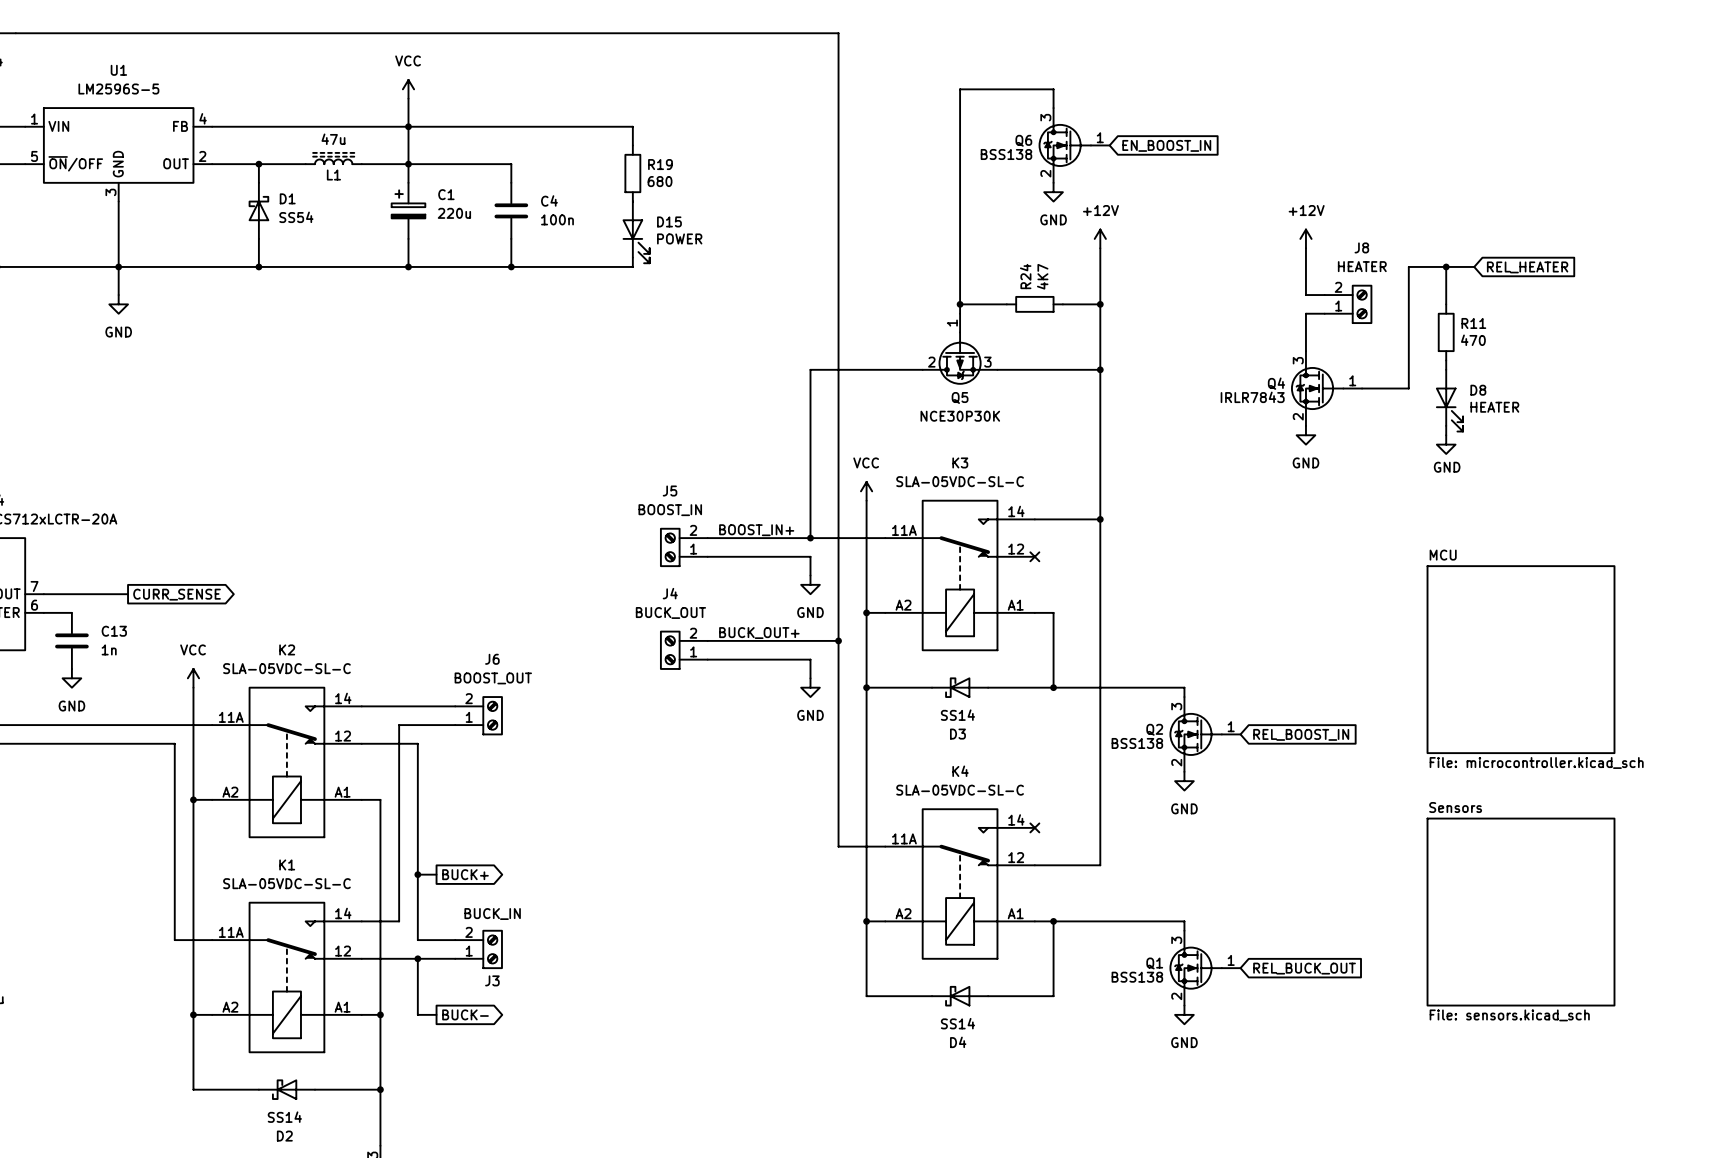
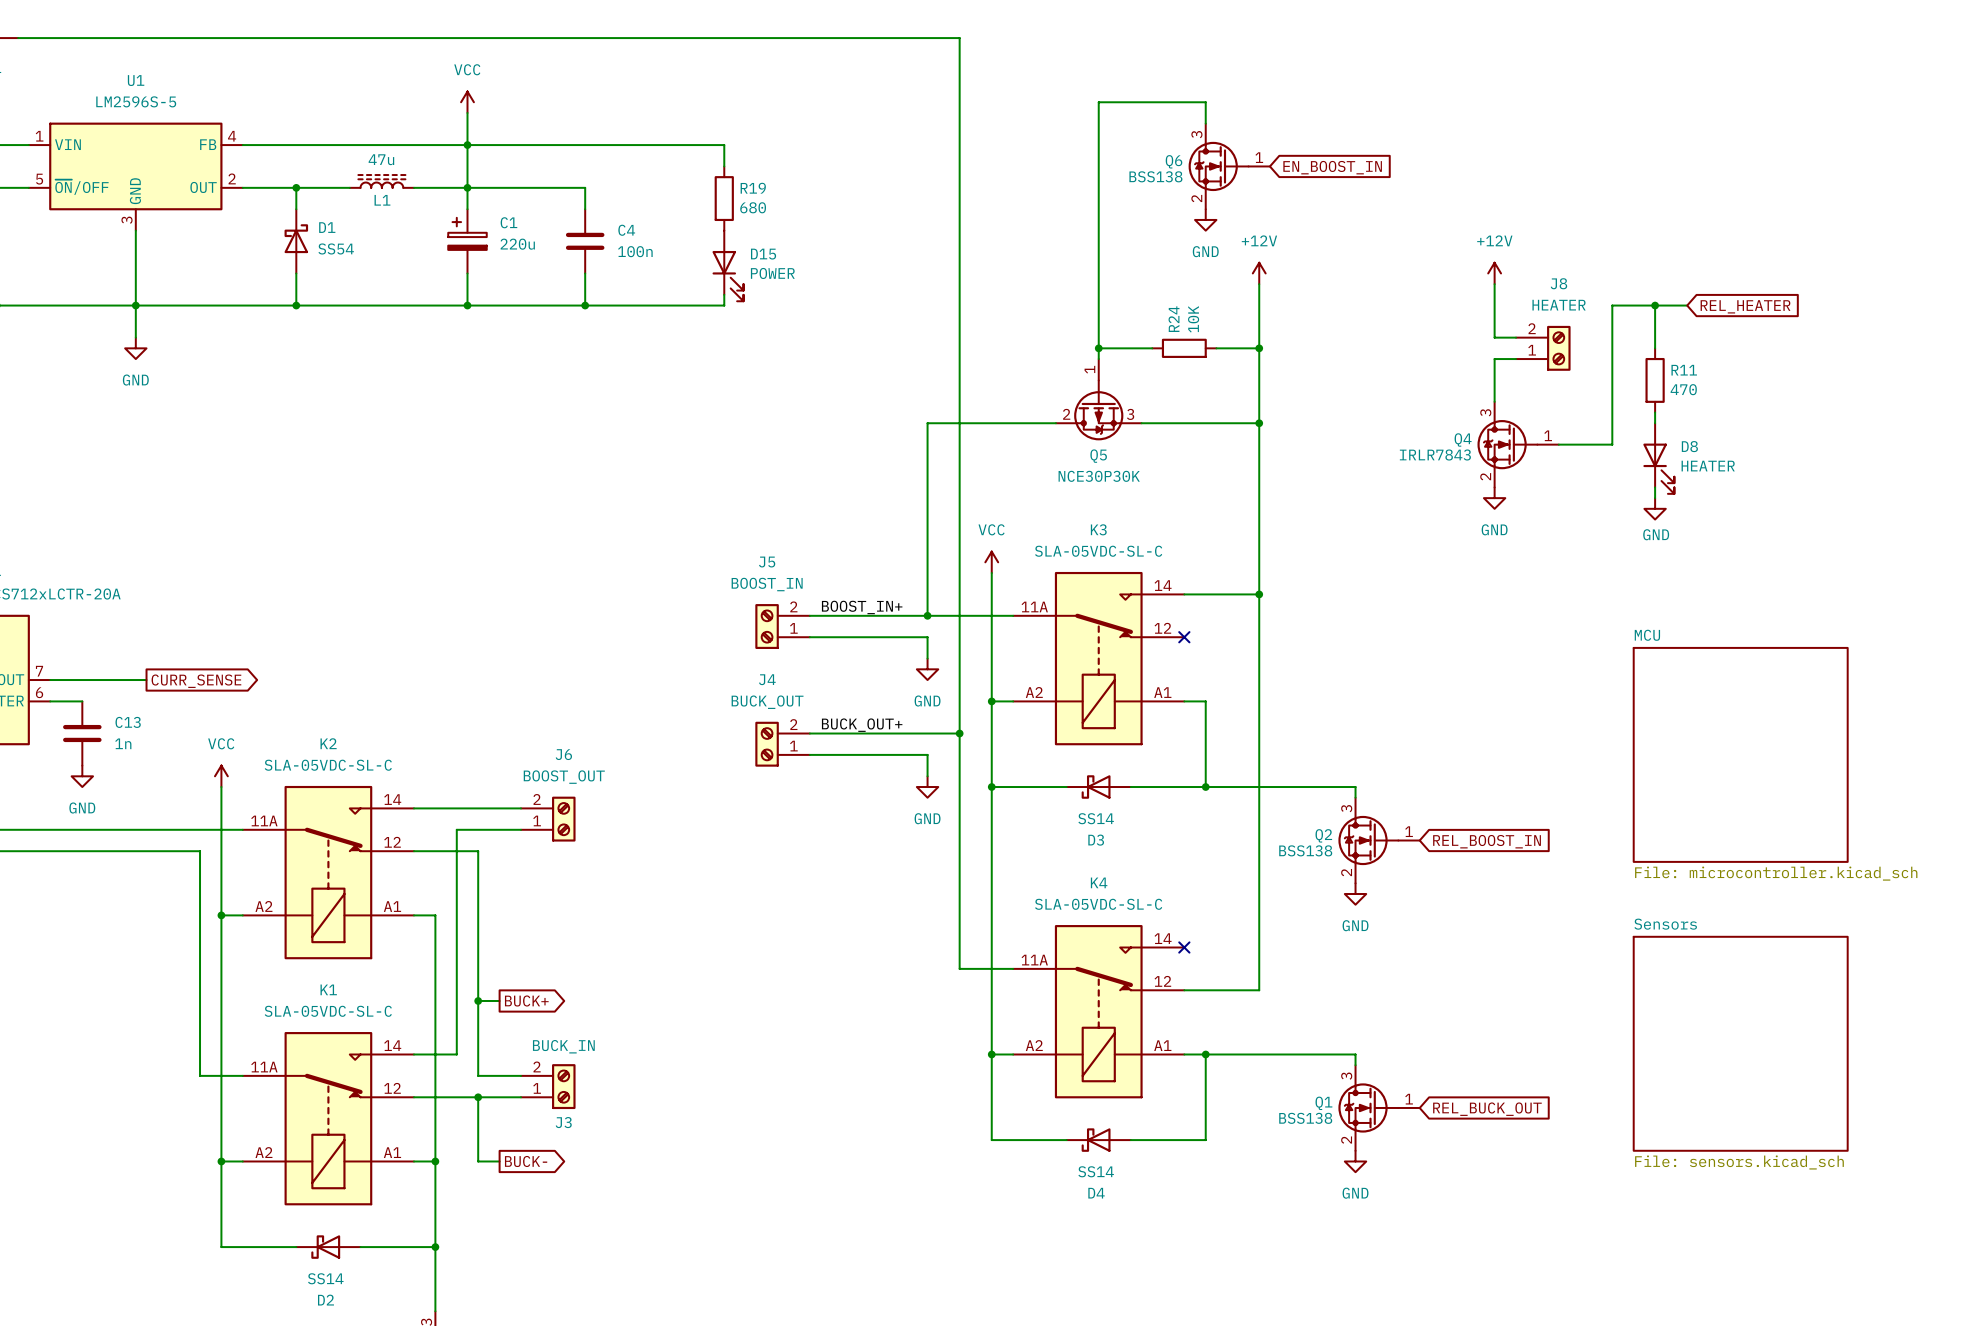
R24 value: 4K7 (1042, 276) -> 10K (1193, 319)

